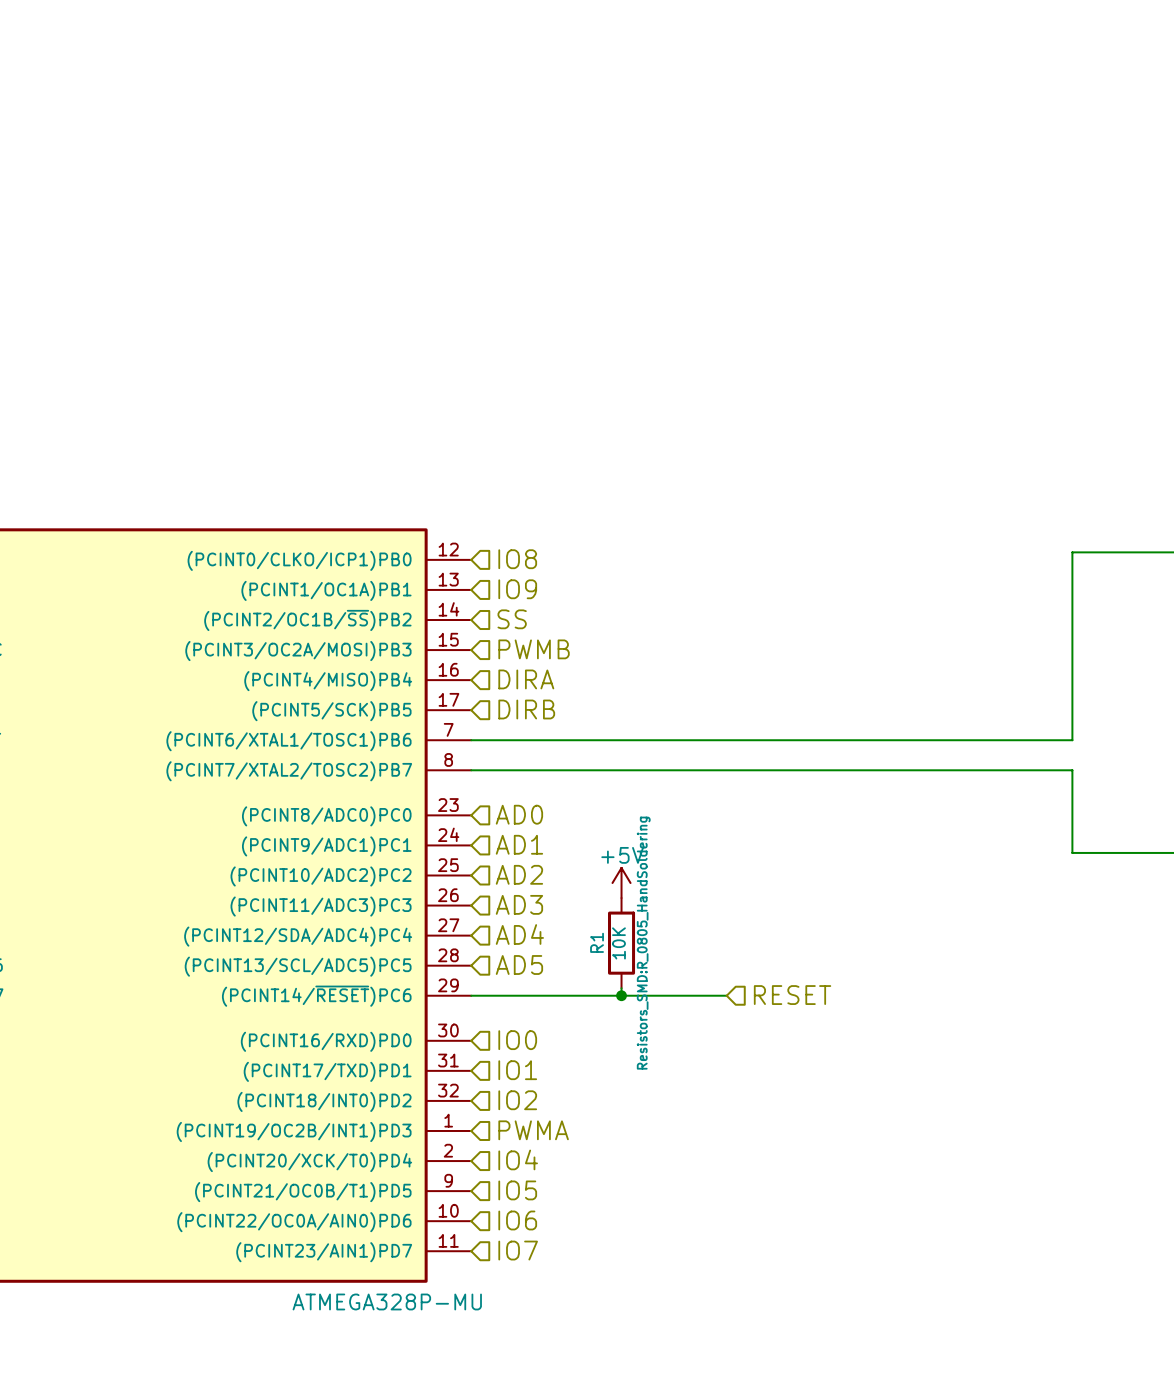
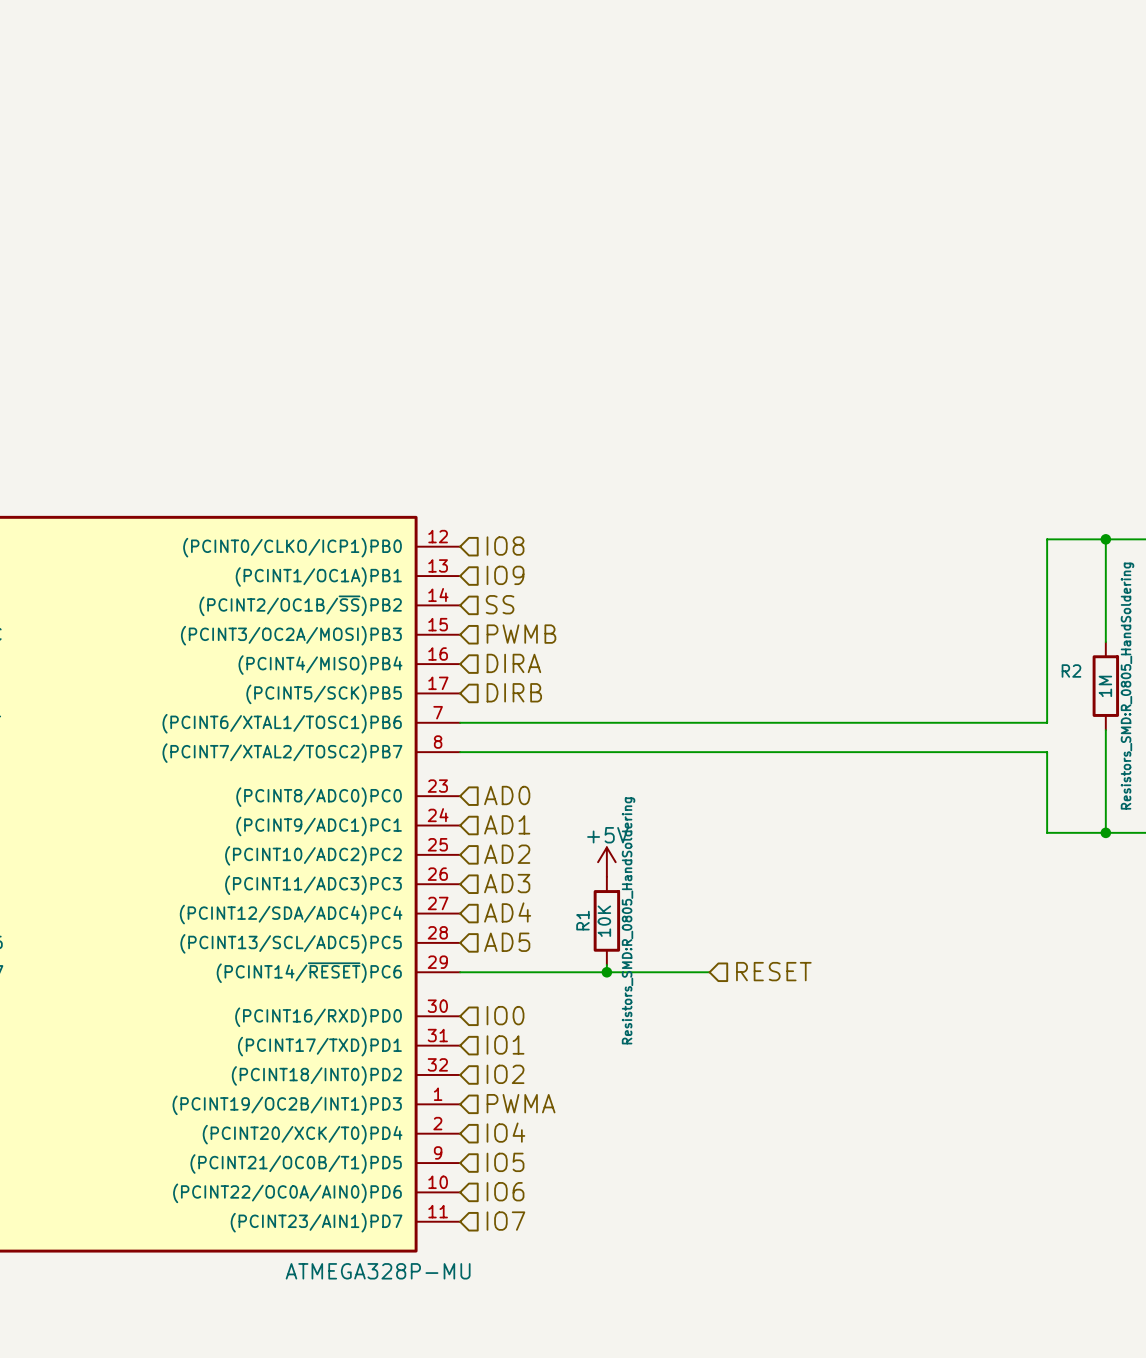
wire: none -> (1105, 539) (1105, 642)
junction: none -> (1105, 539)
R2: none -> 1M (1105, 686)
wire: none -> (1105, 730) (1105, 832)
junction: none -> (1105, 832)

